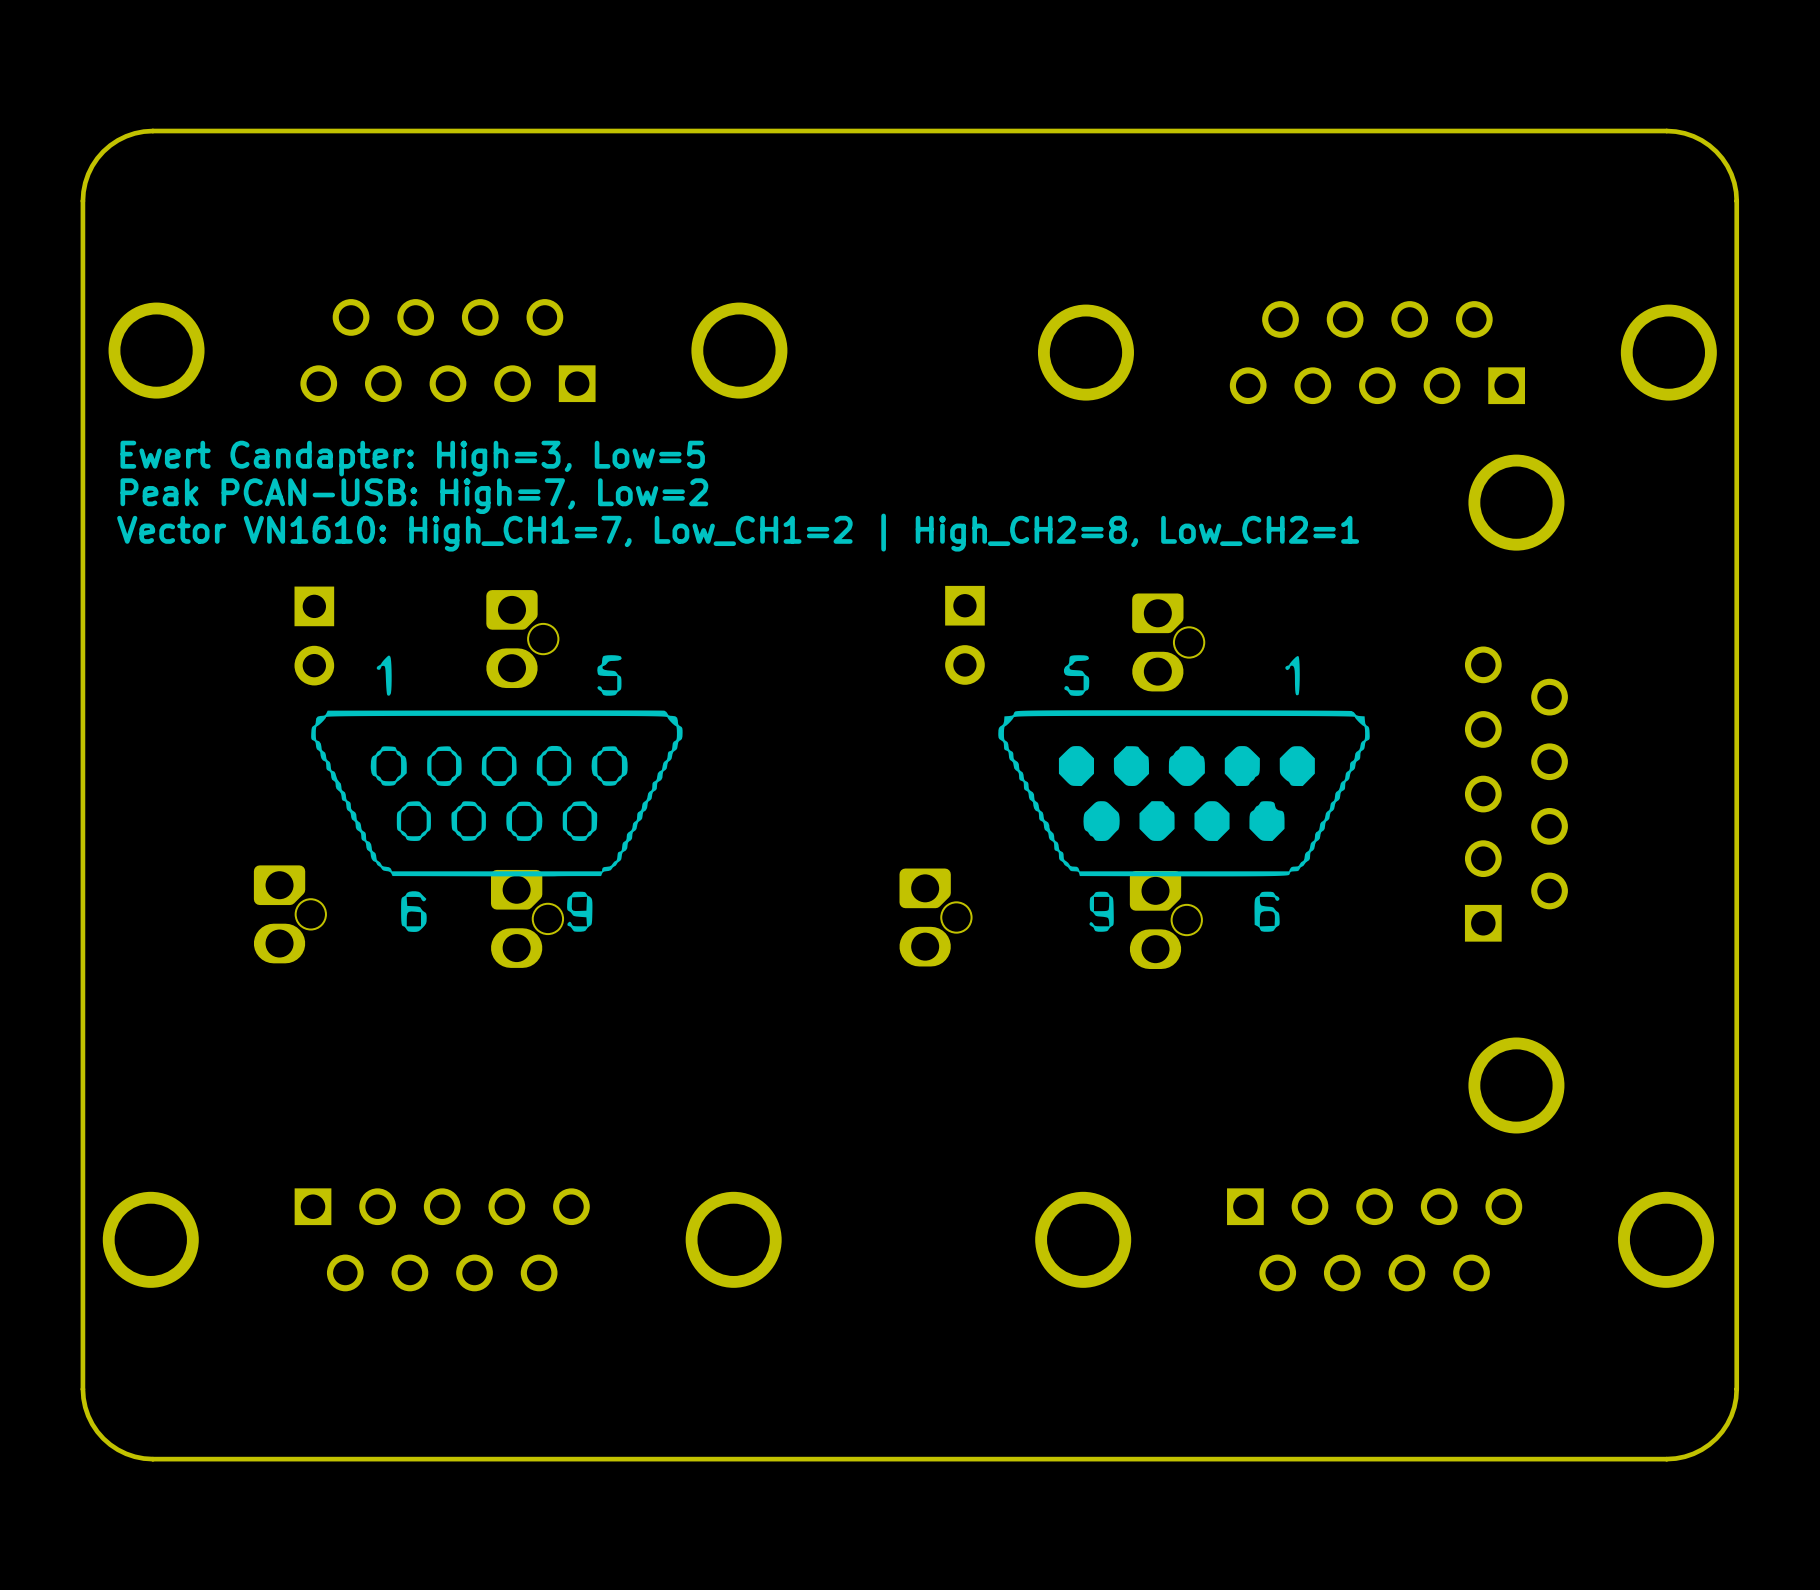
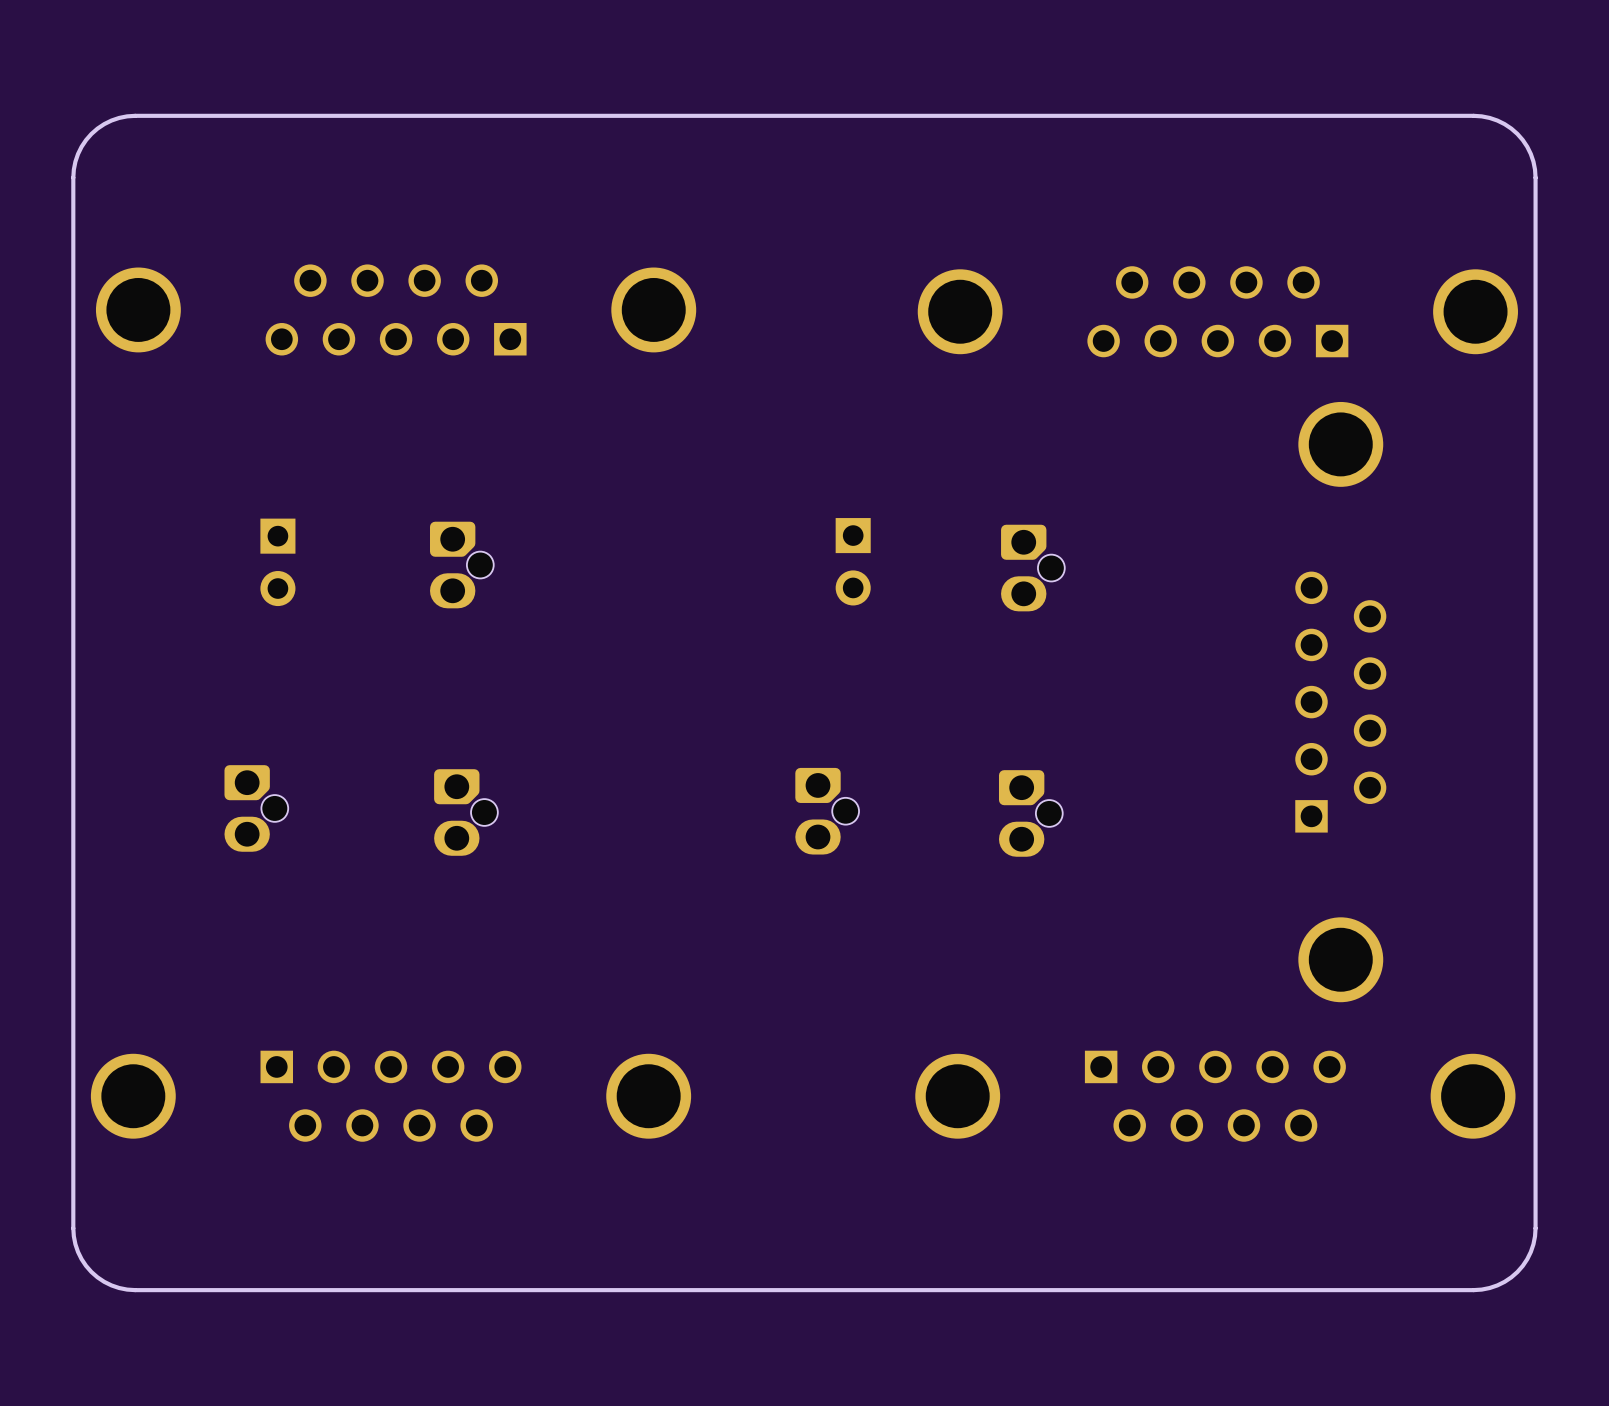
text: Ewert Candapter: High=3, Low=5 (412, 458) -> none
text: Peak PCAN-USB: High=7, Low=2 (414, 496) -> none
text: Vector VN1610: High_CH1=7, Low_CH1=2 | High_CH2=8, Low_CH2=1 (738, 532) -> none
drawing: [311, 655, 1370, 932] -> none

